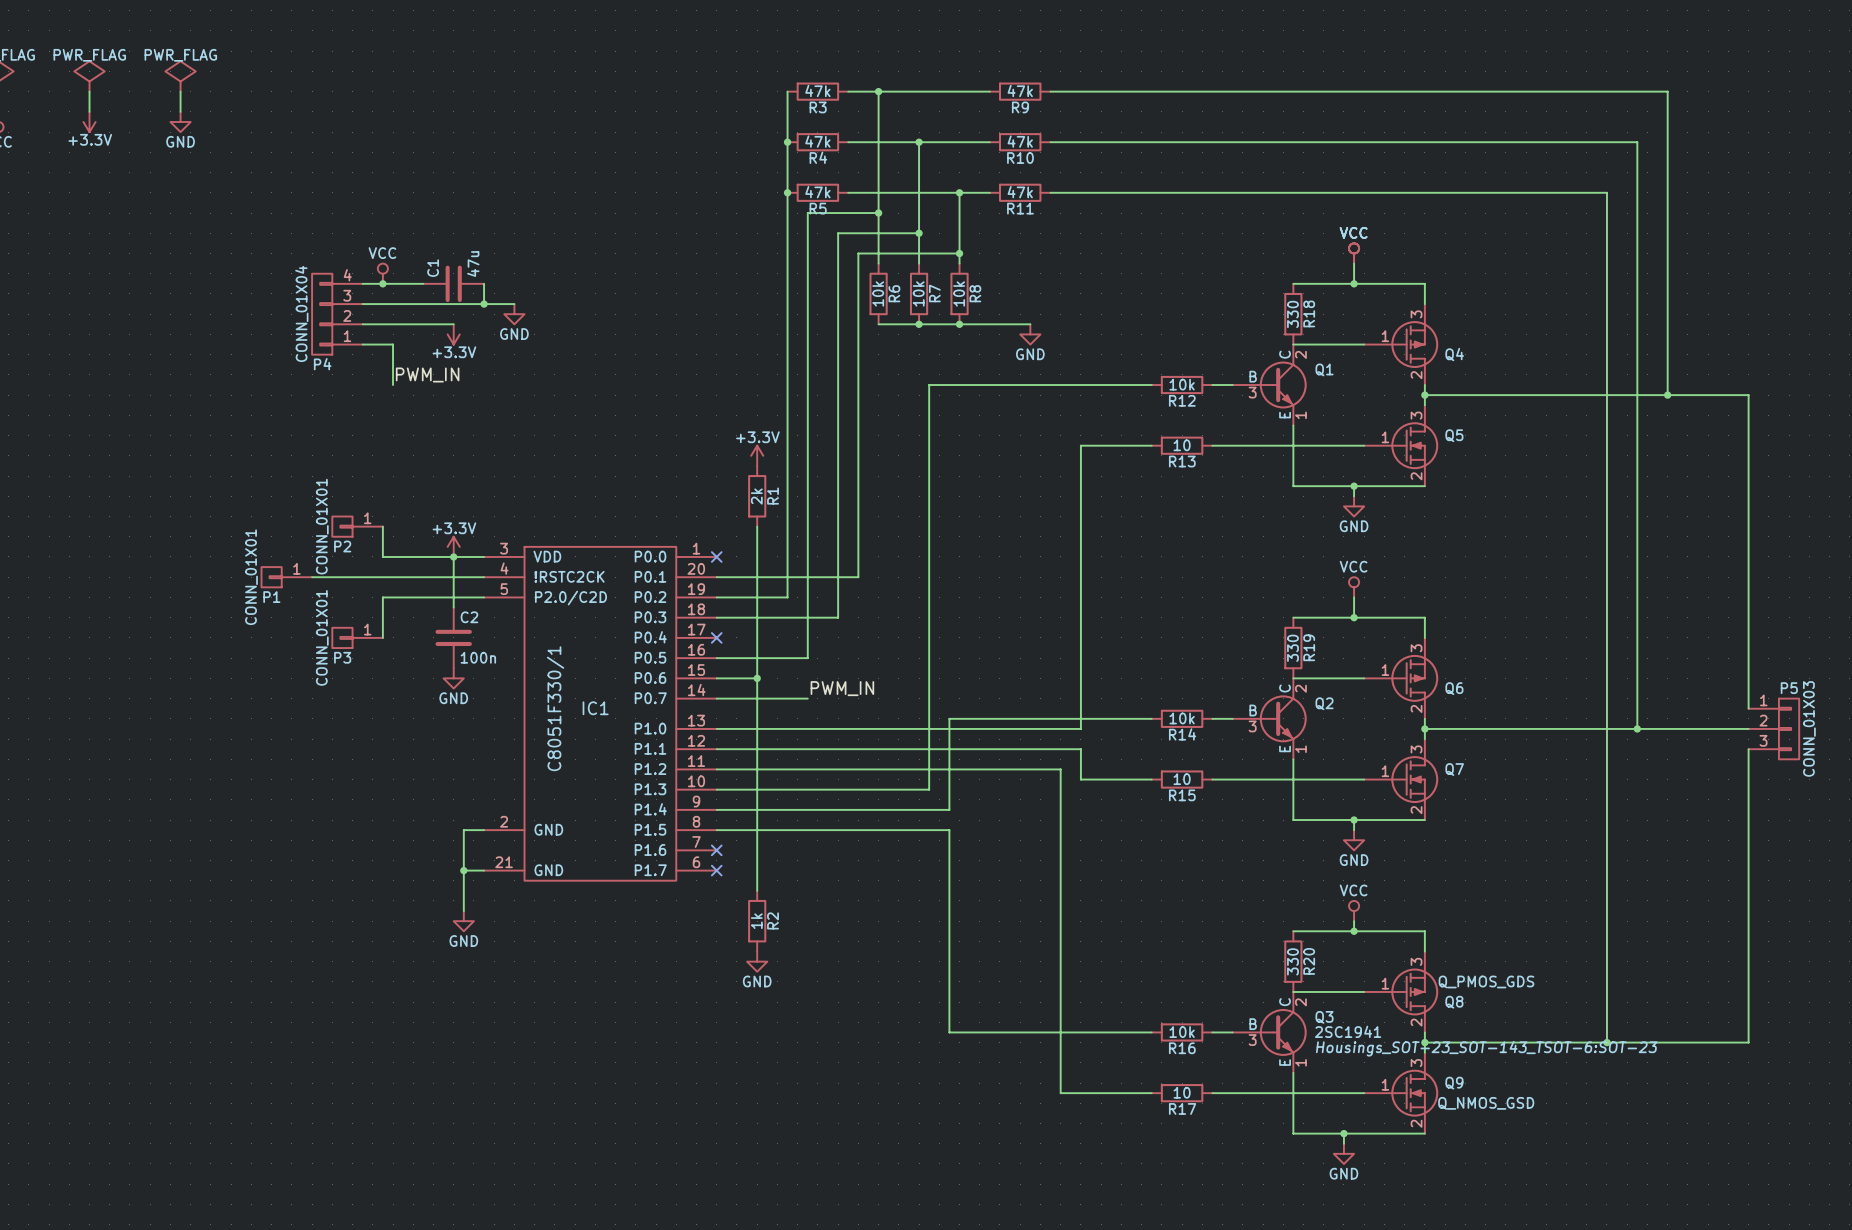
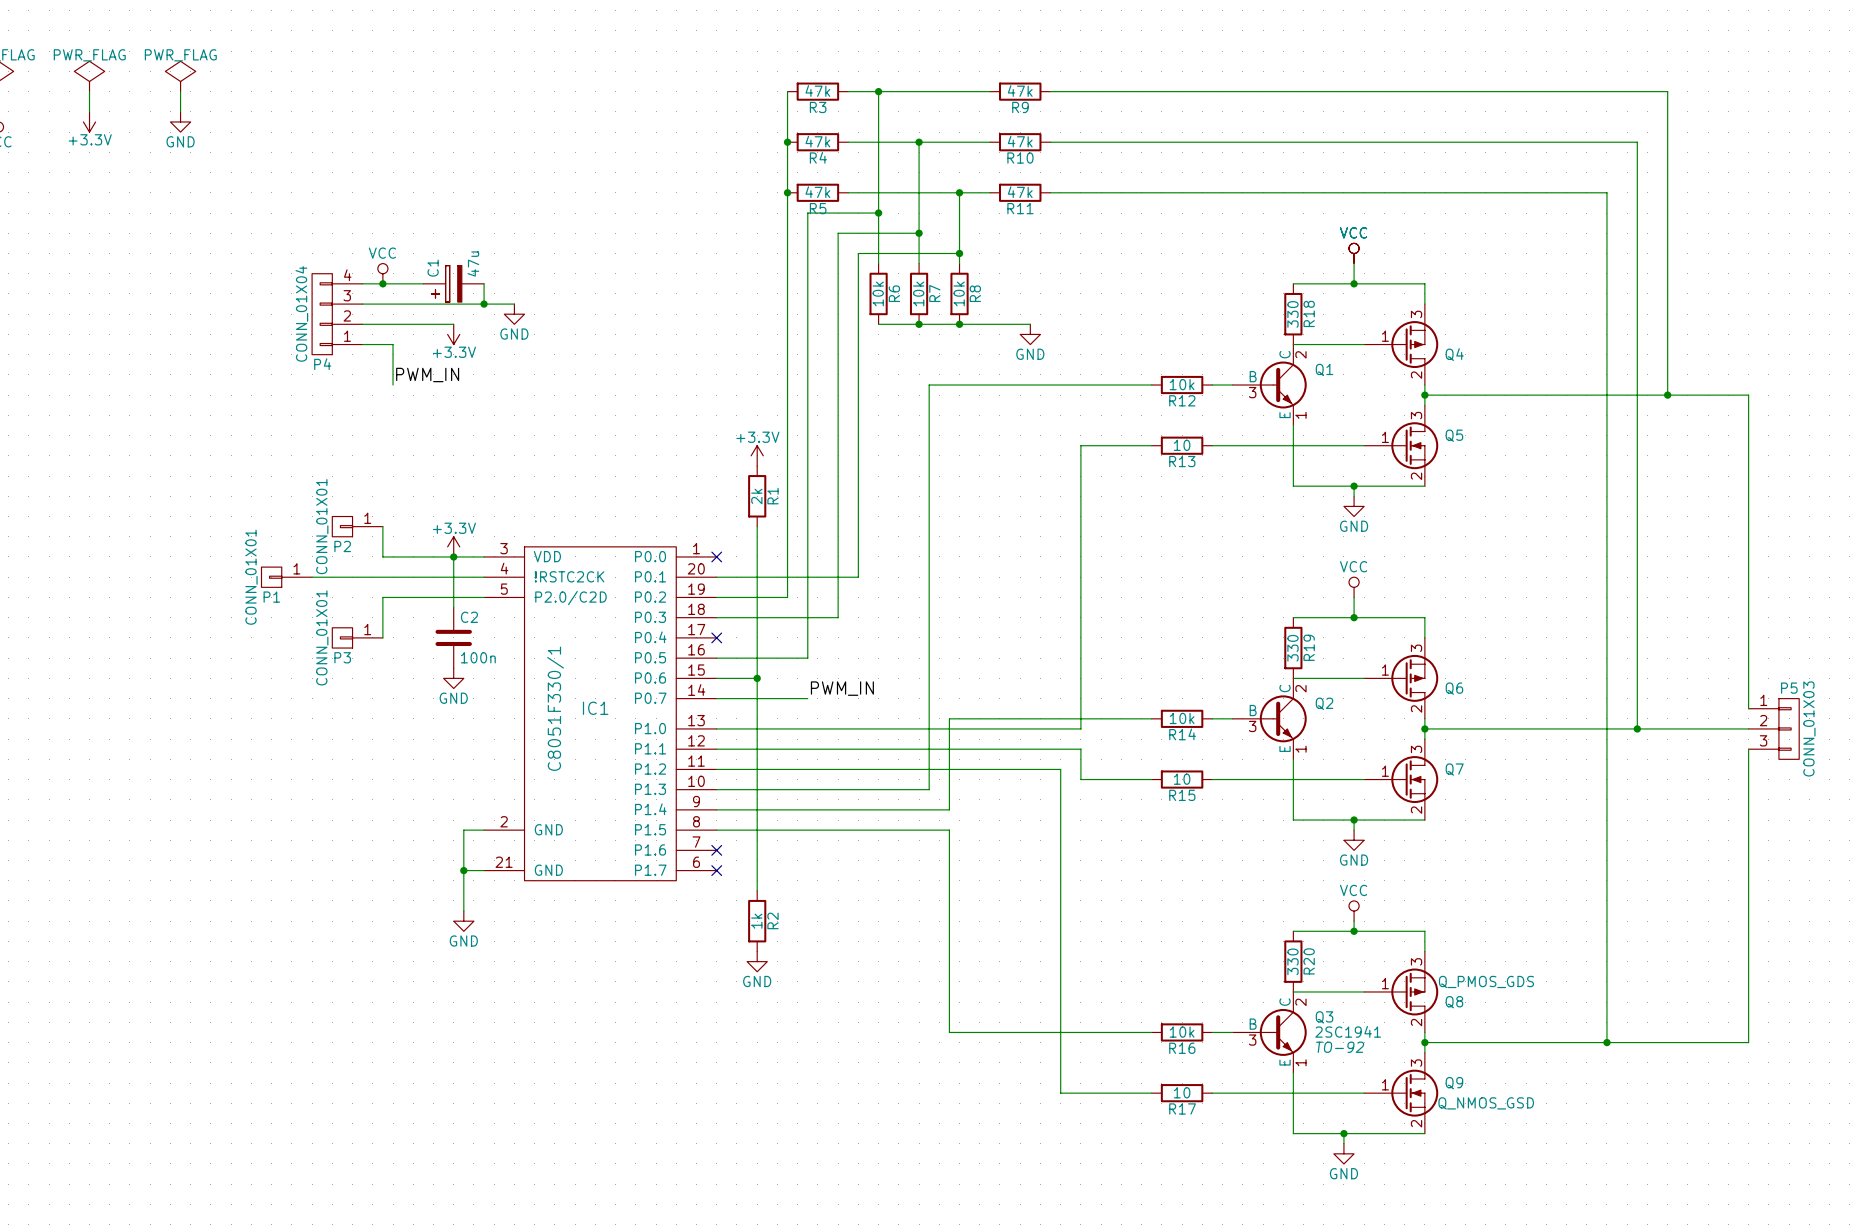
C1 symbol: [423, 265, 485, 303] -> [423, 265, 485, 303]
Q3 text: Housings_SOT-23_SOT-143_TSOT-6:SOT-23 (1486, 1048) -> TO-92 (1340, 1047)

